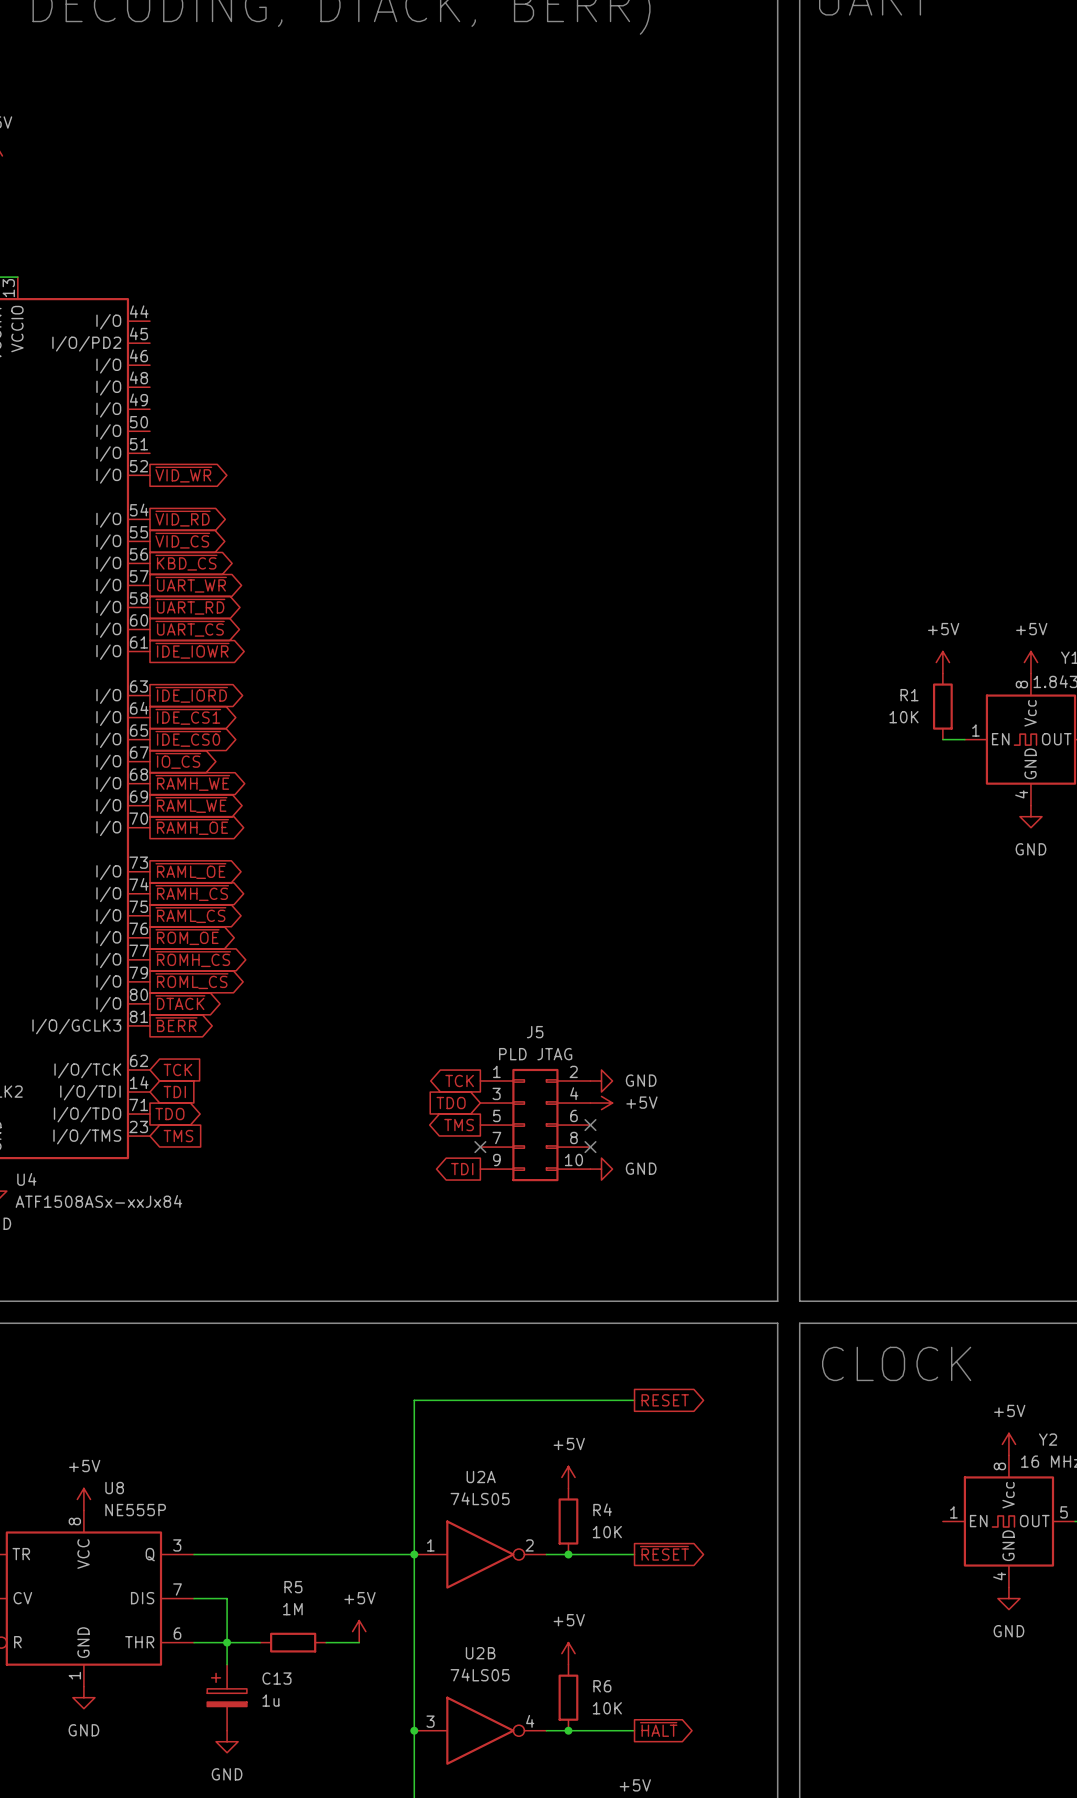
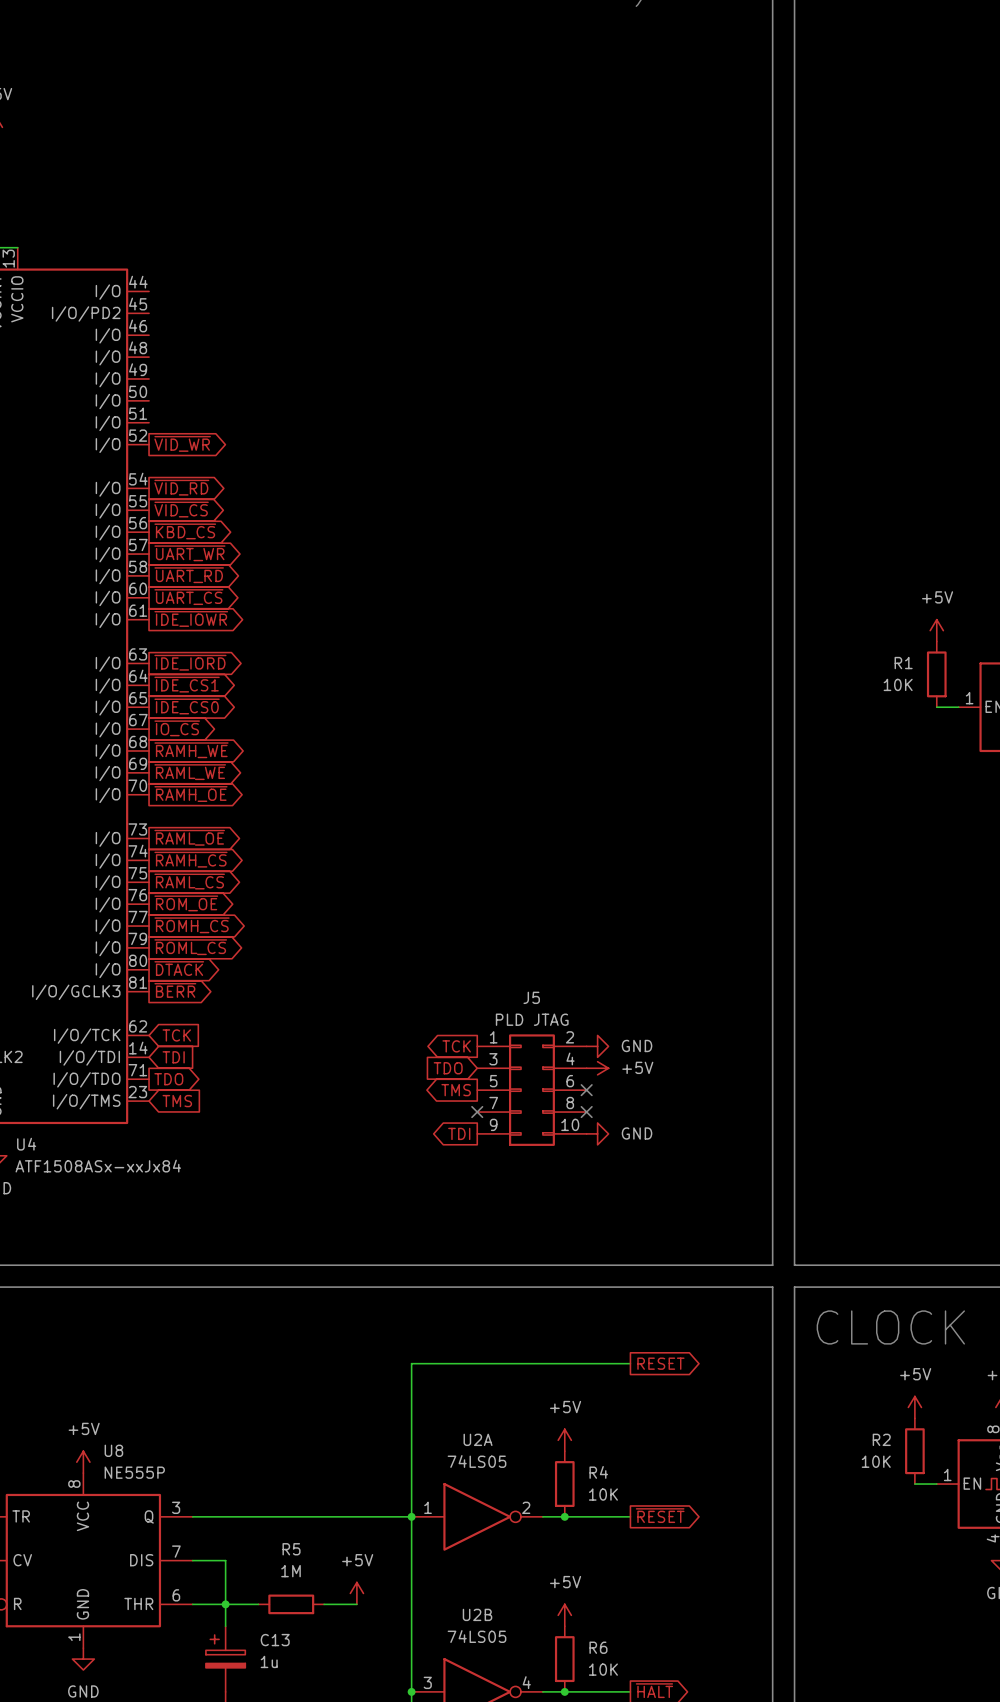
power symbol: none -> +5V (914, 1407)
R2: none -> 10K (914, 1451)
wire: none -> (914, 1484) (936, 1484)

